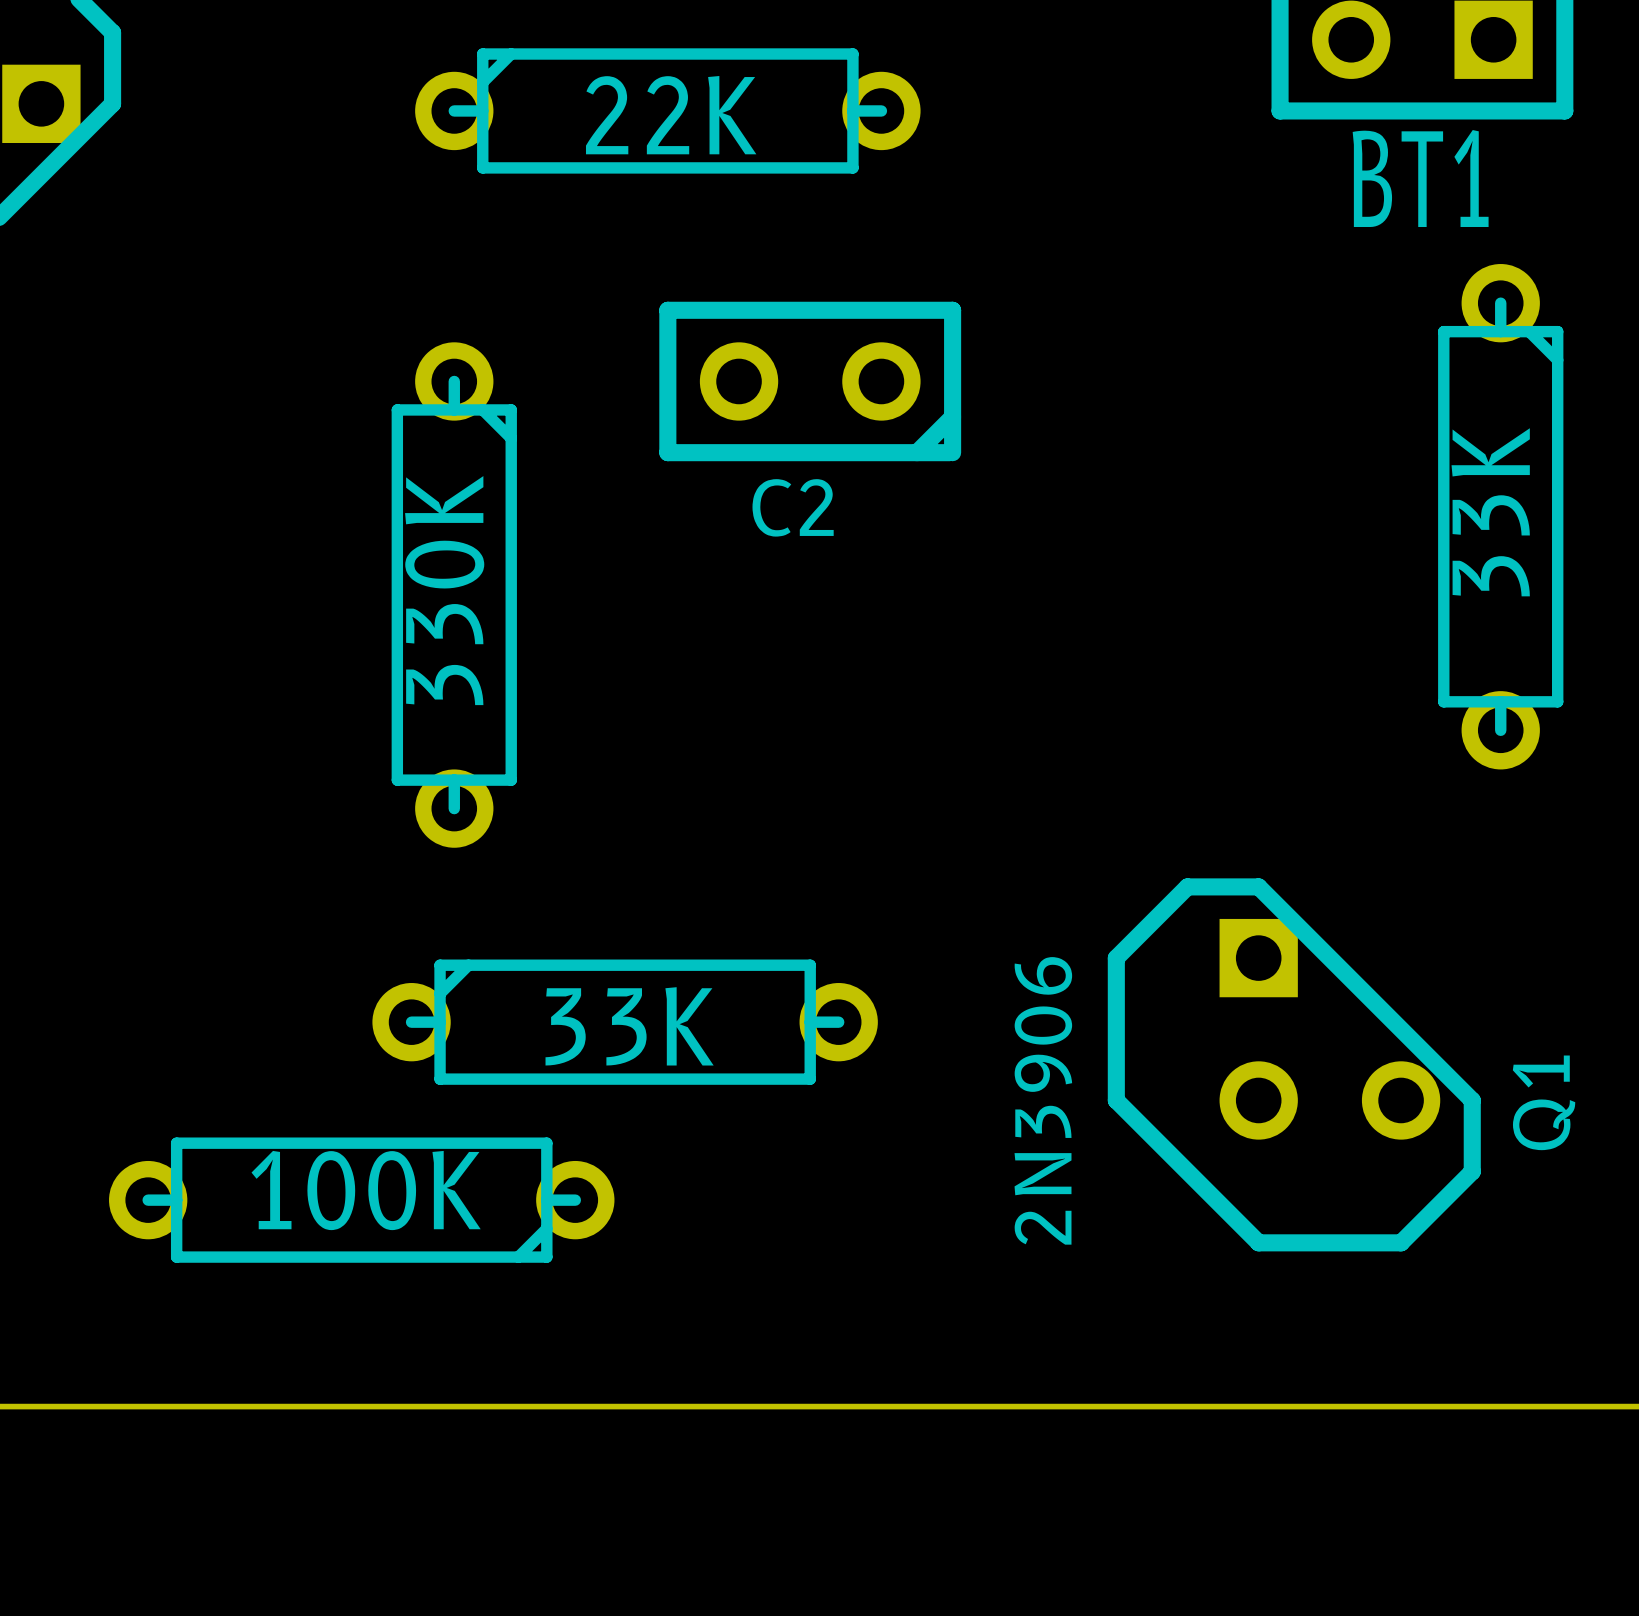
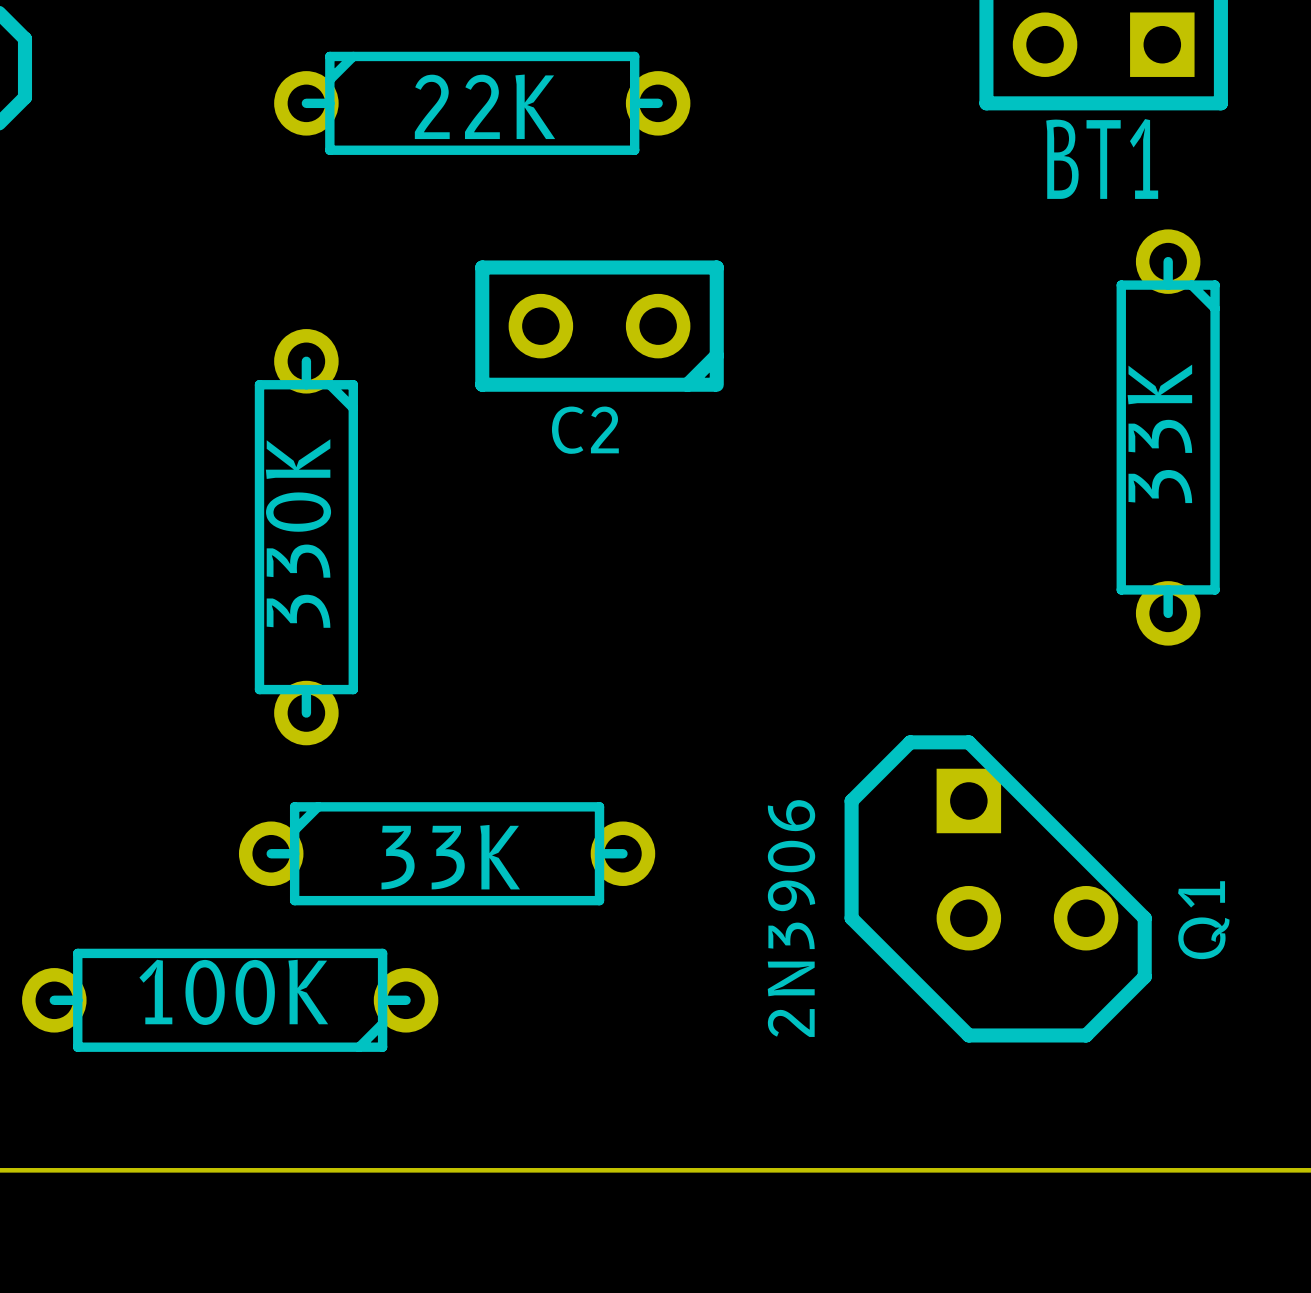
part position: (454, 595) -> (306, 537)

